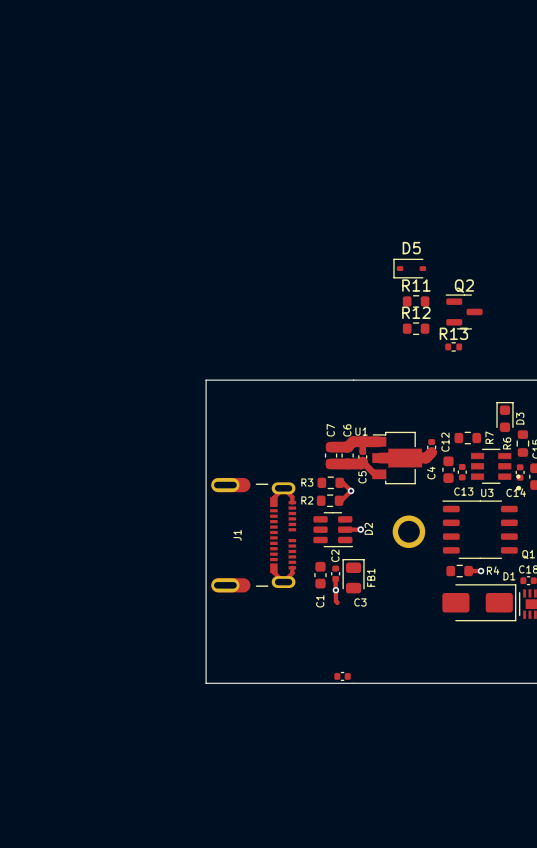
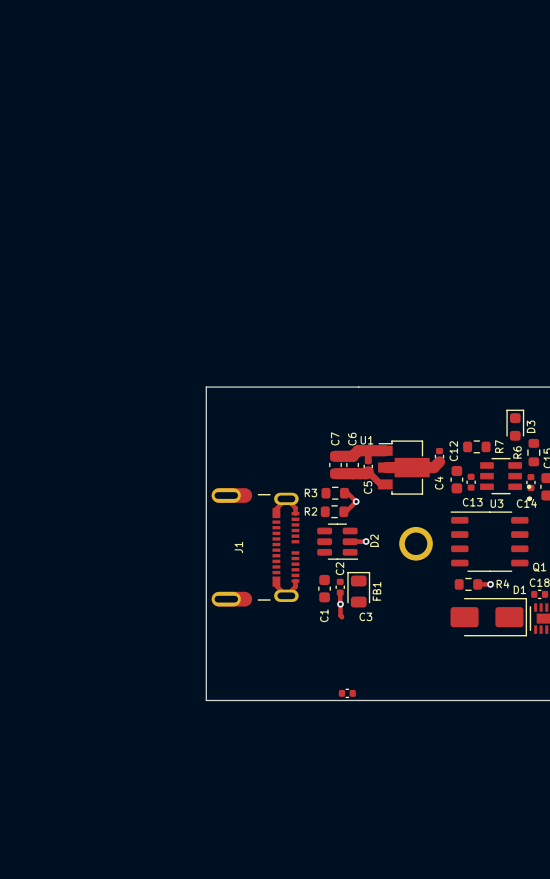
D5: (409, 268) -> none
R11: (416, 301) -> none
Q2: (464, 311) -> none
R12: (416, 328) -> none
R13: (453, 346) -> none

